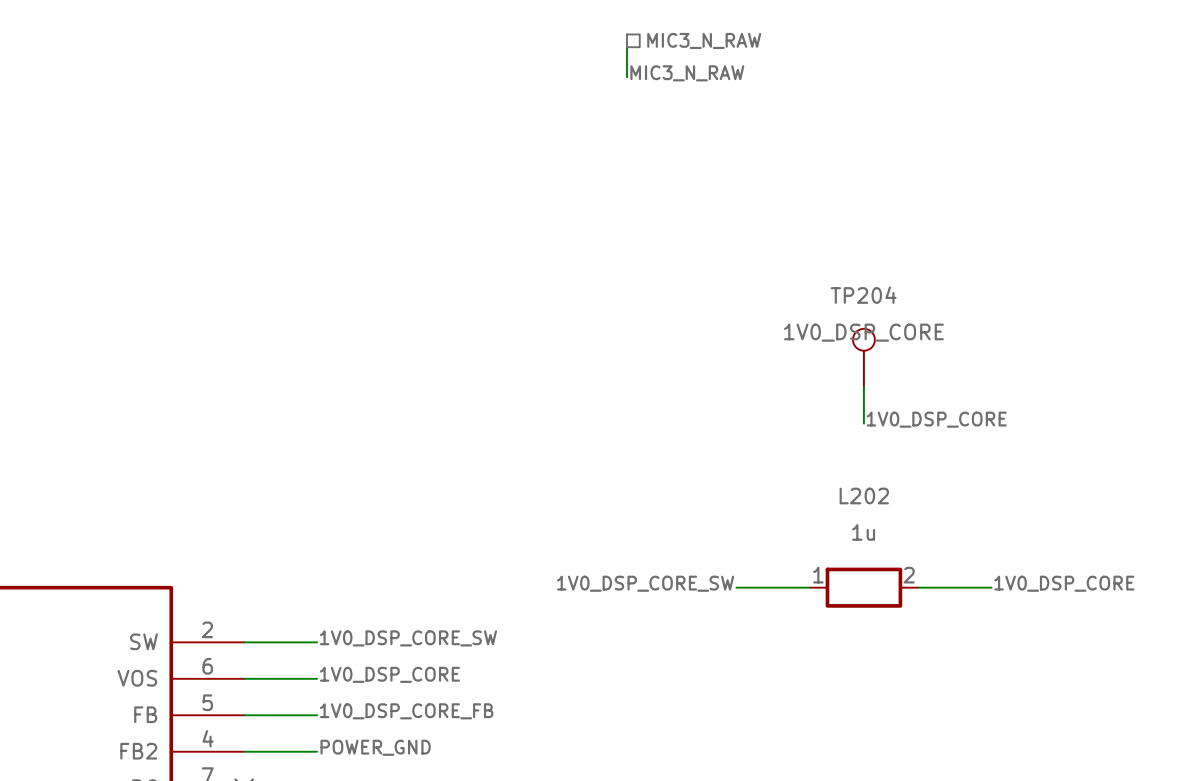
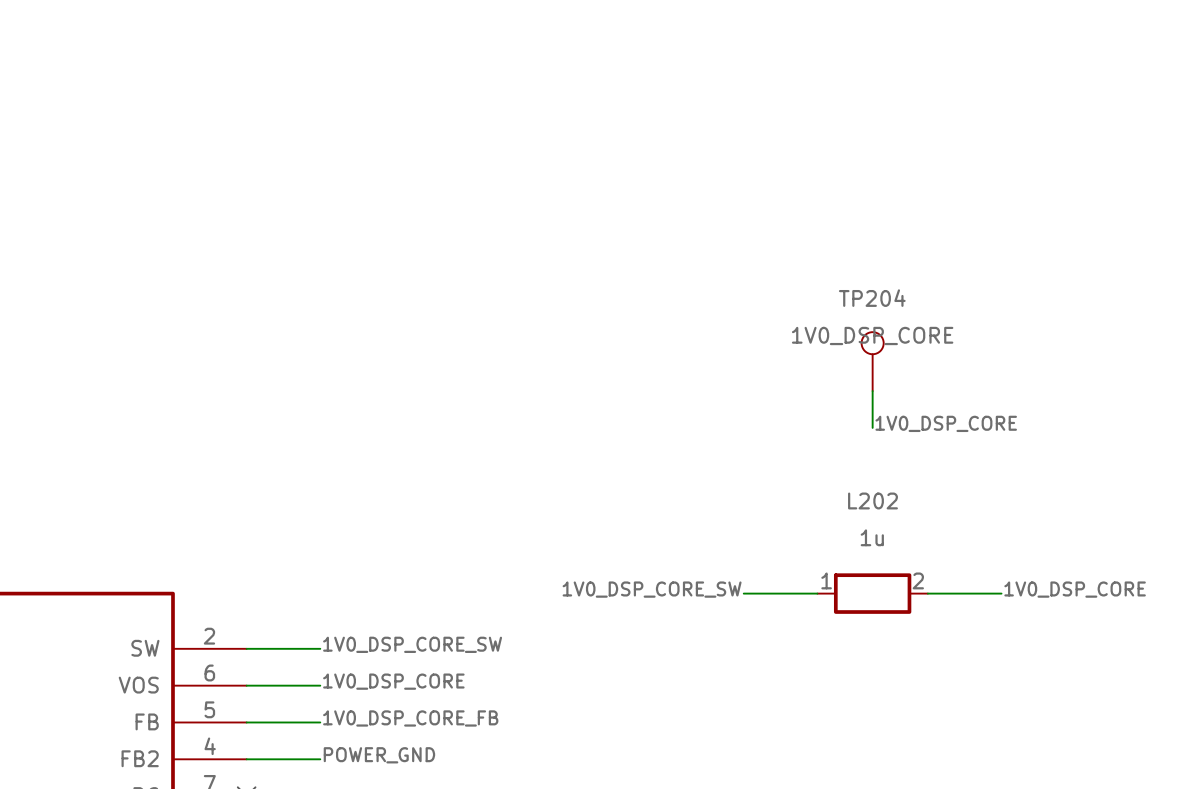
wire: (626, 40) (626, 77) -> none
hierarchical label: MIC3_N_RAW (704, 40) -> none
label: MIC3_N_RAW (687, 73) -> none

